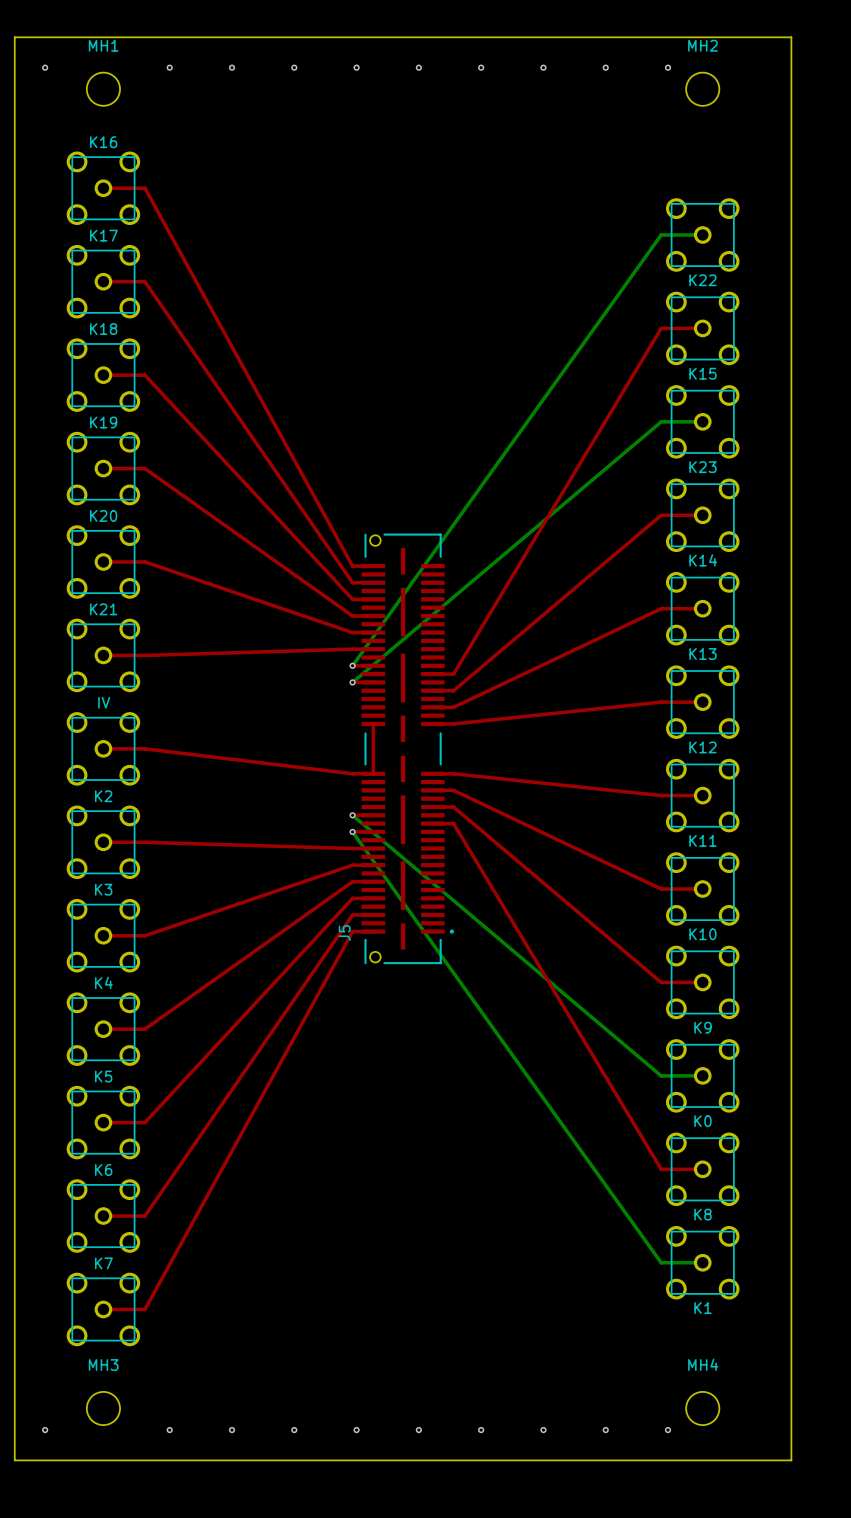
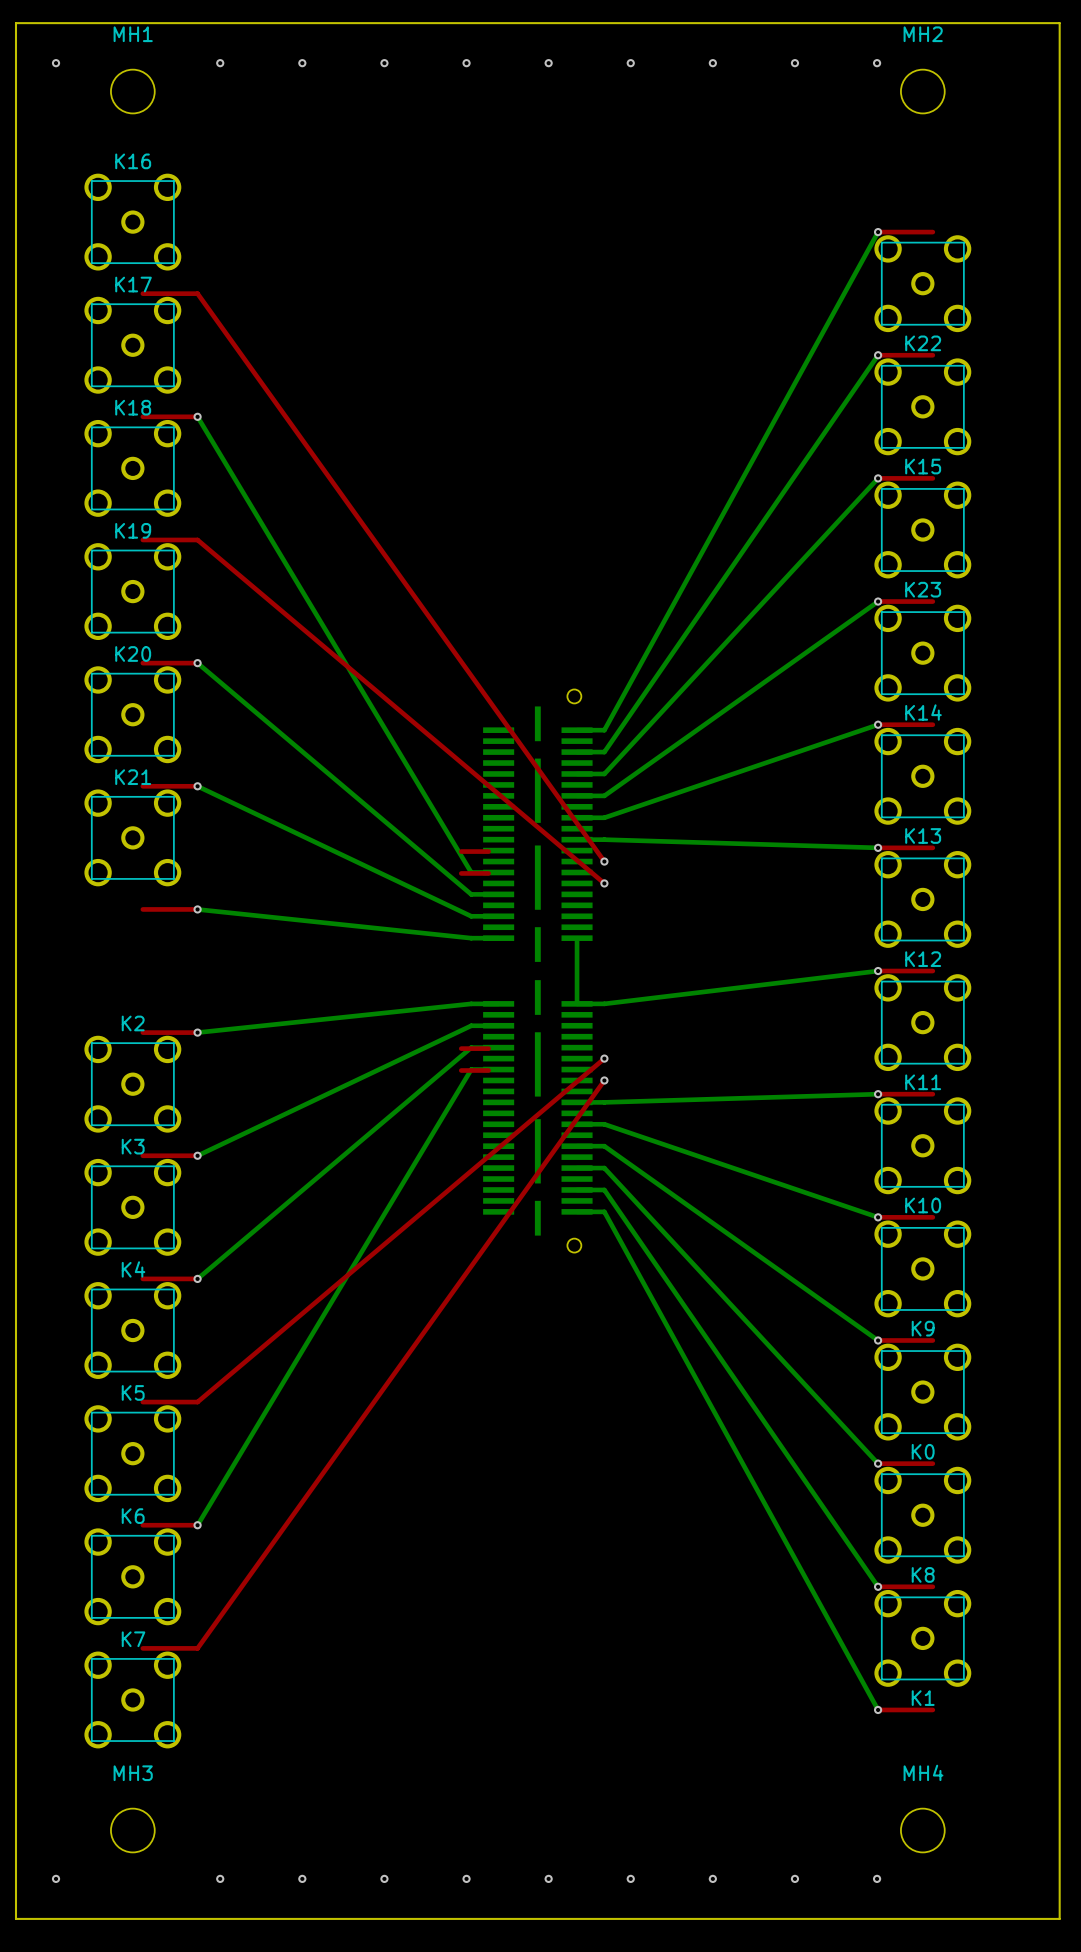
board edge: (791, 37) (791, 1460) (14, 1460) -> (1039, 23) (1059, 23) (1059, 1918) (15, 1918) (15, 1898)
top track: (103, 188) (144, 188) (352, 566) (373, 566) -> none
top track: none -> (878, 232) (932, 232)
bottom track: none -> (878, 232) (604, 730) (577, 730)
via: none -> (878, 232)
bottom track: (702, 234) (661, 234) (352, 665) -> none
top track: none -> (142, 293) (197, 293) (604, 861)
top track: (103, 281) (144, 281) (352, 582) (373, 582) -> none
top track: none -> (878, 355) (932, 355)
bottom track: none -> (878, 355) (604, 752) (577, 752)
via: none -> (878, 355)
top track: (702, 328) (661, 328) (453, 674) (432, 674) -> none
top track: none -> (142, 416) (197, 416)
bottom track: none -> (197, 416) (471, 872) (498, 872)
via: none -> (197, 416)
top track: (103, 375) (144, 375) (352, 599) (373, 599) -> none
top track: none -> (878, 478) (932, 478)
bottom track: none -> (878, 478) (604, 773) (577, 773)
via: none -> (878, 478)
bottom track: (702, 421) (661, 421) (352, 682) -> none
top track: none -> (142, 539) (197, 539) (604, 883)
top track: (103, 468) (144, 468) (352, 615) (373, 615) -> none
top track: none -> (878, 601) (932, 601)
bottom track: none -> (878, 601) (604, 795) (577, 795)
via: none -> (878, 601)
top track: (702, 515) (661, 515) (453, 690) (432, 690) -> none
top track: none -> (142, 663) (197, 663)
bottom track: none -> (197, 663) (471, 894) (498, 894)
via: none -> (197, 663)
top track: (103, 562) (144, 562) (352, 632) (373, 632) -> none
top track: none -> (878, 724) (932, 724)
bottom track: none -> (878, 724) (604, 817) (577, 817)
via: none -> (878, 724)
top track: (702, 608) (661, 608) (453, 707) (432, 707) -> none
top track: none -> (142, 786) (197, 786)
bottom track: none -> (197, 786) (471, 916) (498, 916)
via: none -> (197, 786)
top track: (373, 649) (103, 655) -> none
bottom track: none -> (577, 839) (878, 847)
top track: none -> (878, 847) (932, 847)
via: none -> (878, 847)
via: (352, 665) -> none
via: none -> (604, 861)
via: (352, 682) -> none
via: none -> (604, 883)
top track: (702, 702) (661, 702) (453, 723) (432, 723) -> none
top track: none -> (142, 909) (197, 909)
bottom track: none -> (197, 909) (471, 938) (498, 938)
via: none -> (197, 909)
top track: (373, 723) (373, 773) (352, 773) (144, 748) (103, 748) -> none
bottom track: none -> (577, 938) (577, 1003) (604, 1003) (878, 971)
IV: (103, 748) -> none
J5: (407, 748) -> none
part: none -> (537, 971)
top track: none -> (878, 971) (932, 971)
via: none -> (878, 971)
top track: (432, 773) (453, 773) (661, 795) (702, 795) -> none
bottom track: none -> (498, 1003) (471, 1003) (197, 1032)
top track: (432, 790) (453, 790) (661, 889) (702, 889) -> none
bottom track: none -> (498, 1025) (471, 1025) (197, 1155)
top track: none -> (142, 1032) (197, 1032)
via: none -> (197, 1032)
top track: (432, 807) (453, 807) (661, 982) (702, 982) -> none
bottom track: none -> (498, 1047) (471, 1047) (197, 1278)
bottom track: (352, 815) (661, 1075) (702, 1075) -> none
via: (352, 815) -> none
top track: none -> (604, 1058) (197, 1402) (142, 1402)
via: none -> (604, 1058)
top track: (432, 823) (453, 823) (661, 1169) (702, 1169) -> none
bottom track: (352, 831) (661, 1262) (702, 1262) -> none
via: (352, 831) -> none
bottom track: none -> (498, 1069) (471, 1069) (197, 1525)
top track: none -> (604, 1080) (197, 1648) (142, 1648)
via: none -> (604, 1080)
top track: (103, 842) (373, 848) -> none
top track: none -> (878, 1094) (932, 1094)
bottom track: none -> (878, 1094) (577, 1102)
via: none -> (878, 1094)
top track: (373, 865) (352, 865) (144, 935) (103, 935) -> none
bottom track: none -> (577, 1124) (604, 1124) (878, 1217)
top track: (373, 881) (352, 881) (144, 1029) (103, 1029) -> none
bottom track: none -> (577, 1146) (604, 1146) (878, 1340)
top track: none -> (142, 1155) (197, 1155)
via: none -> (197, 1155)
top track: (373, 898) (352, 898) (144, 1122) (103, 1122) -> none
bottom track: none -> (577, 1168) (604, 1168) (878, 1463)
top track: (373, 914) (352, 914) (144, 1216) (103, 1216) -> none
bottom track: none -> (577, 1189) (604, 1189) (878, 1586)
top track: (373, 931) (352, 931) (144, 1309) (103, 1309) -> none
bottom track: none -> (577, 1211) (604, 1211) (878, 1709)
top track: none -> (878, 1217) (932, 1217)
via: none -> (878, 1217)
top track: none -> (142, 1278) (197, 1278)
via: none -> (197, 1278)
top track: none -> (878, 1340) (932, 1340)
via: none -> (878, 1340)
top track: none -> (878, 1463) (932, 1463)
via: none -> (878, 1463)
top track: none -> (142, 1525) (197, 1525)
via: none -> (197, 1525)
top track: none -> (878, 1586) (932, 1586)
via: none -> (878, 1586)
top track: none -> (878, 1709) (932, 1709)
via: none -> (878, 1709)
via position: (45, 1430) -> (56, 1878)
via position: (169, 1430) -> (220, 1878)
via position: (232, 1430) -> (302, 1878)
via position: (294, 1430) -> (384, 1878)
via position: (356, 1430) -> (466, 1878)
via position: (418, 1430) -> (548, 1878)
via position: (481, 1430) -> (630, 1878)
via position: (543, 1430) -> (712, 1878)
via position: (605, 1430) -> (794, 1878)
via position: (668, 1430) -> (877, 1878)

